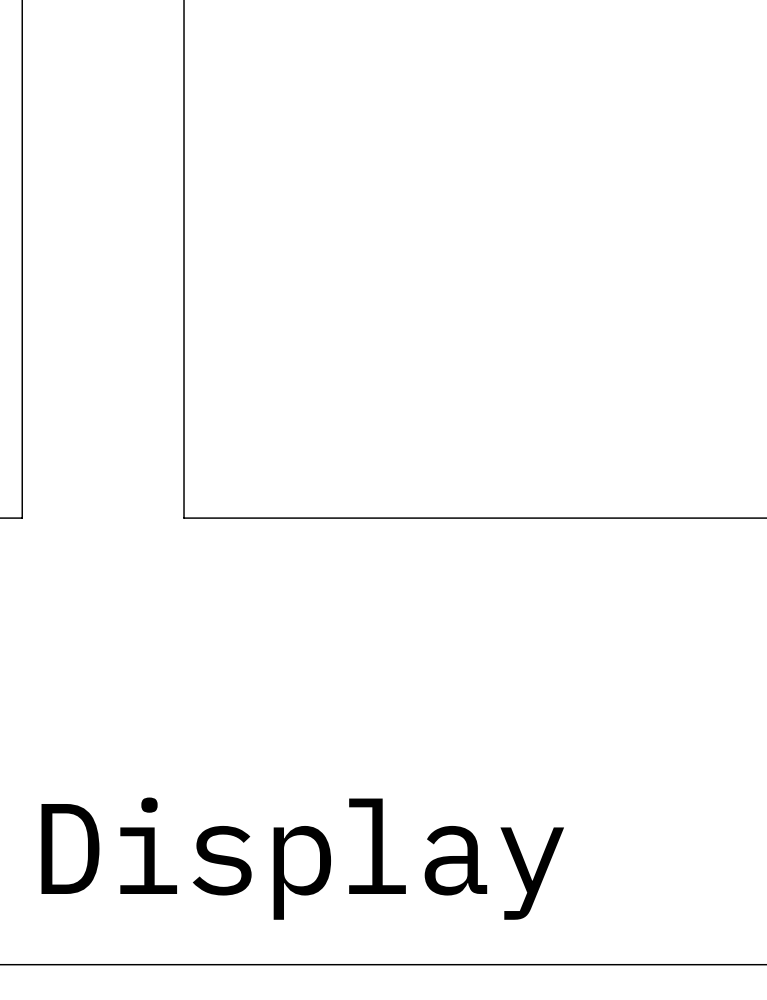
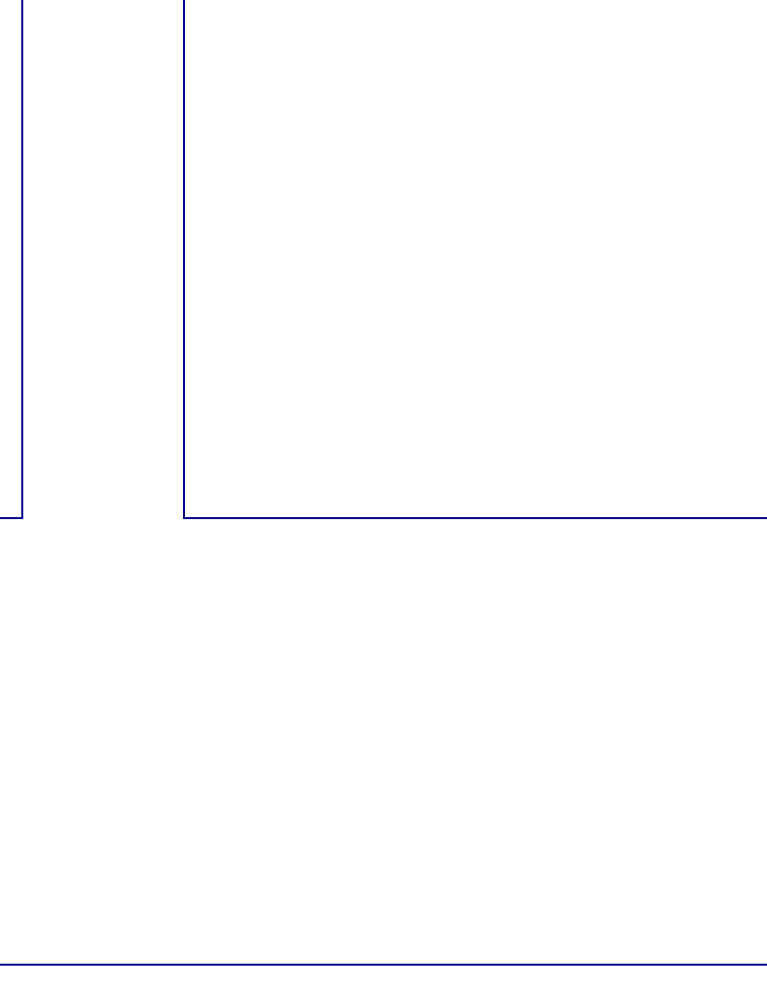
text: Display (302, 858) -> none

